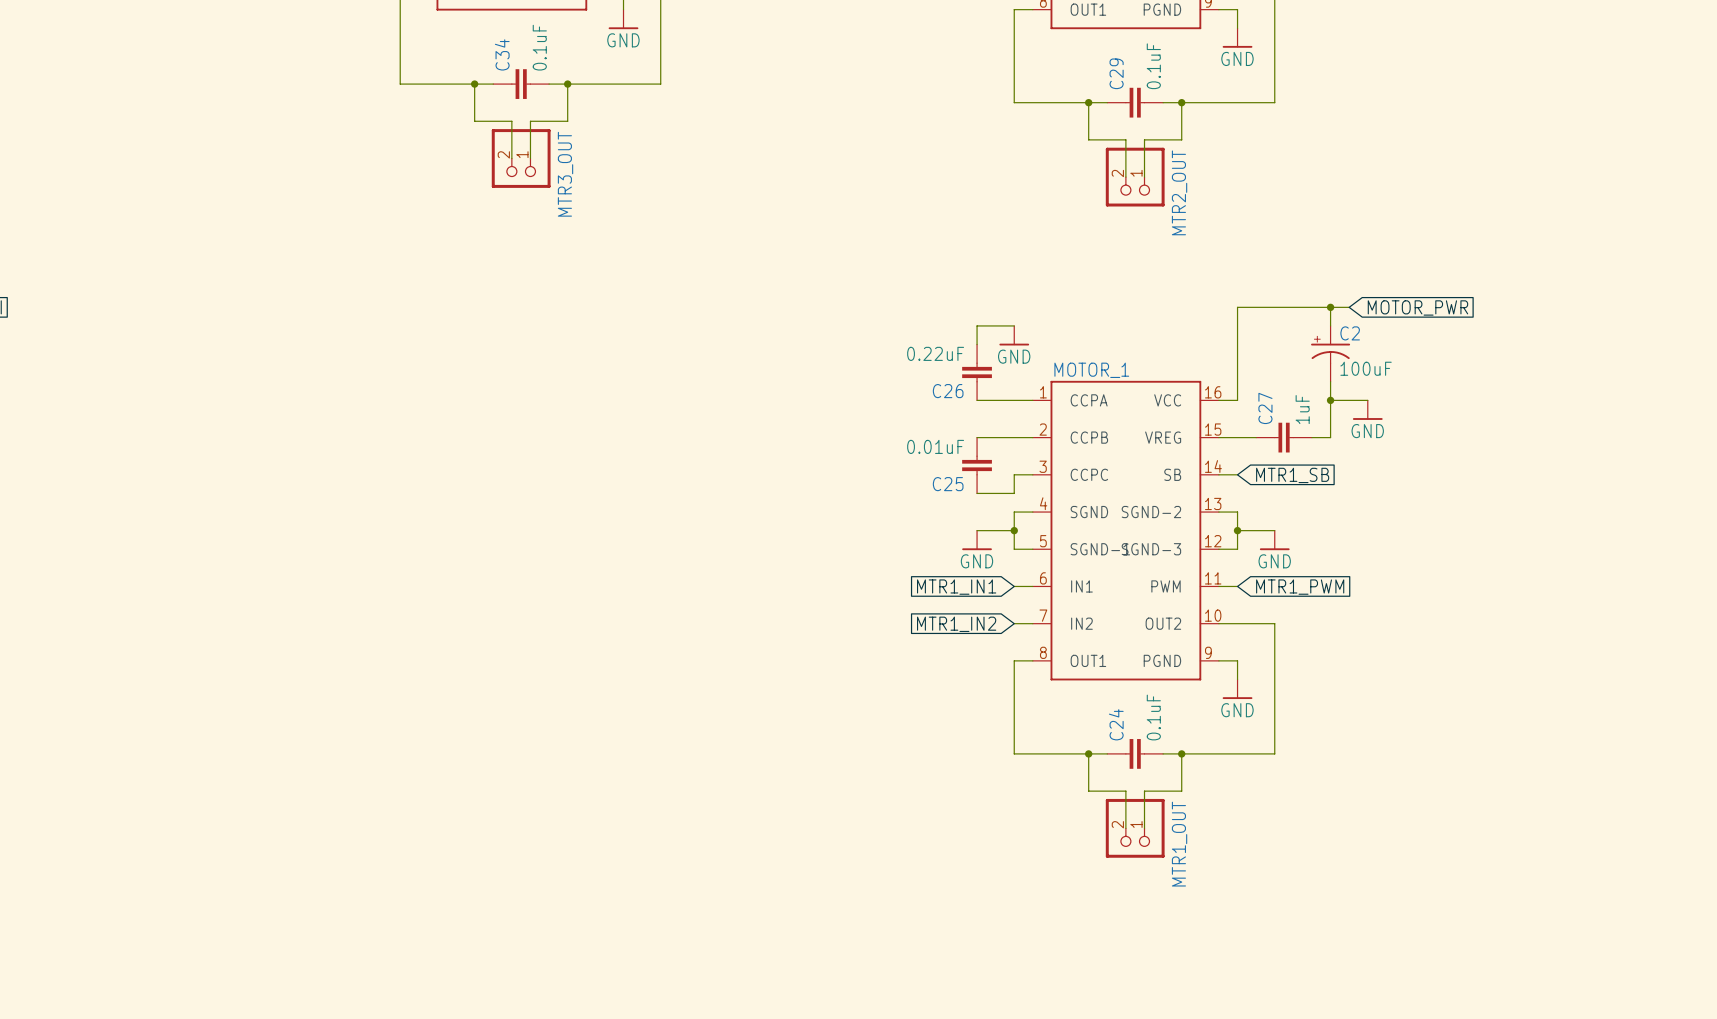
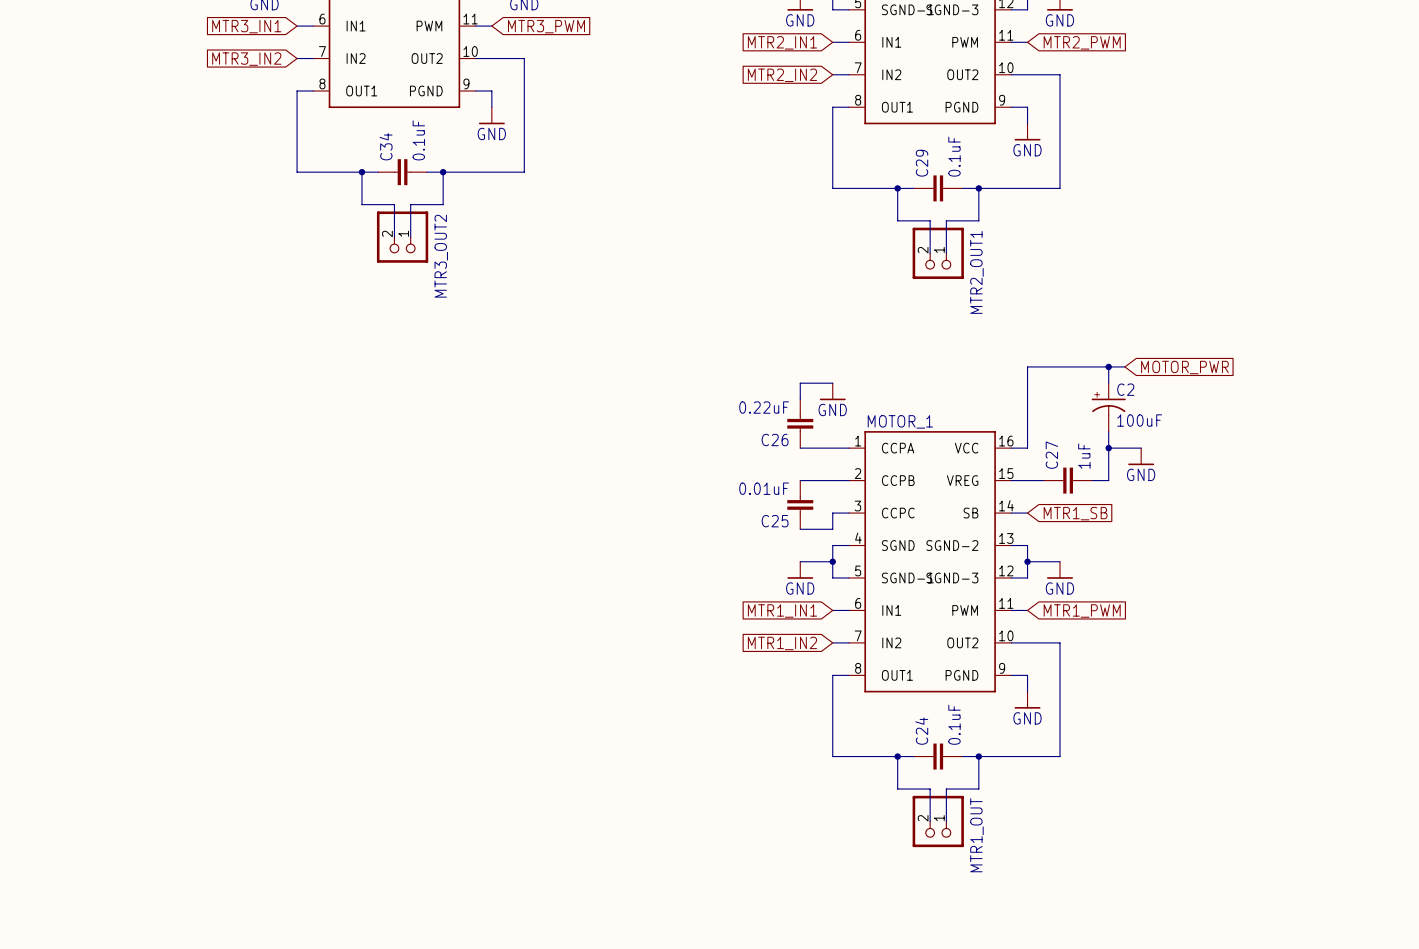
MTR3_OUT name: MTR3_OUT (565, 174) -> MTR3_OUT2 (441, 256)
MTR2_OUT name: MTR2_OUT (1179, 192) -> MTR2_OUT1 (976, 272)

